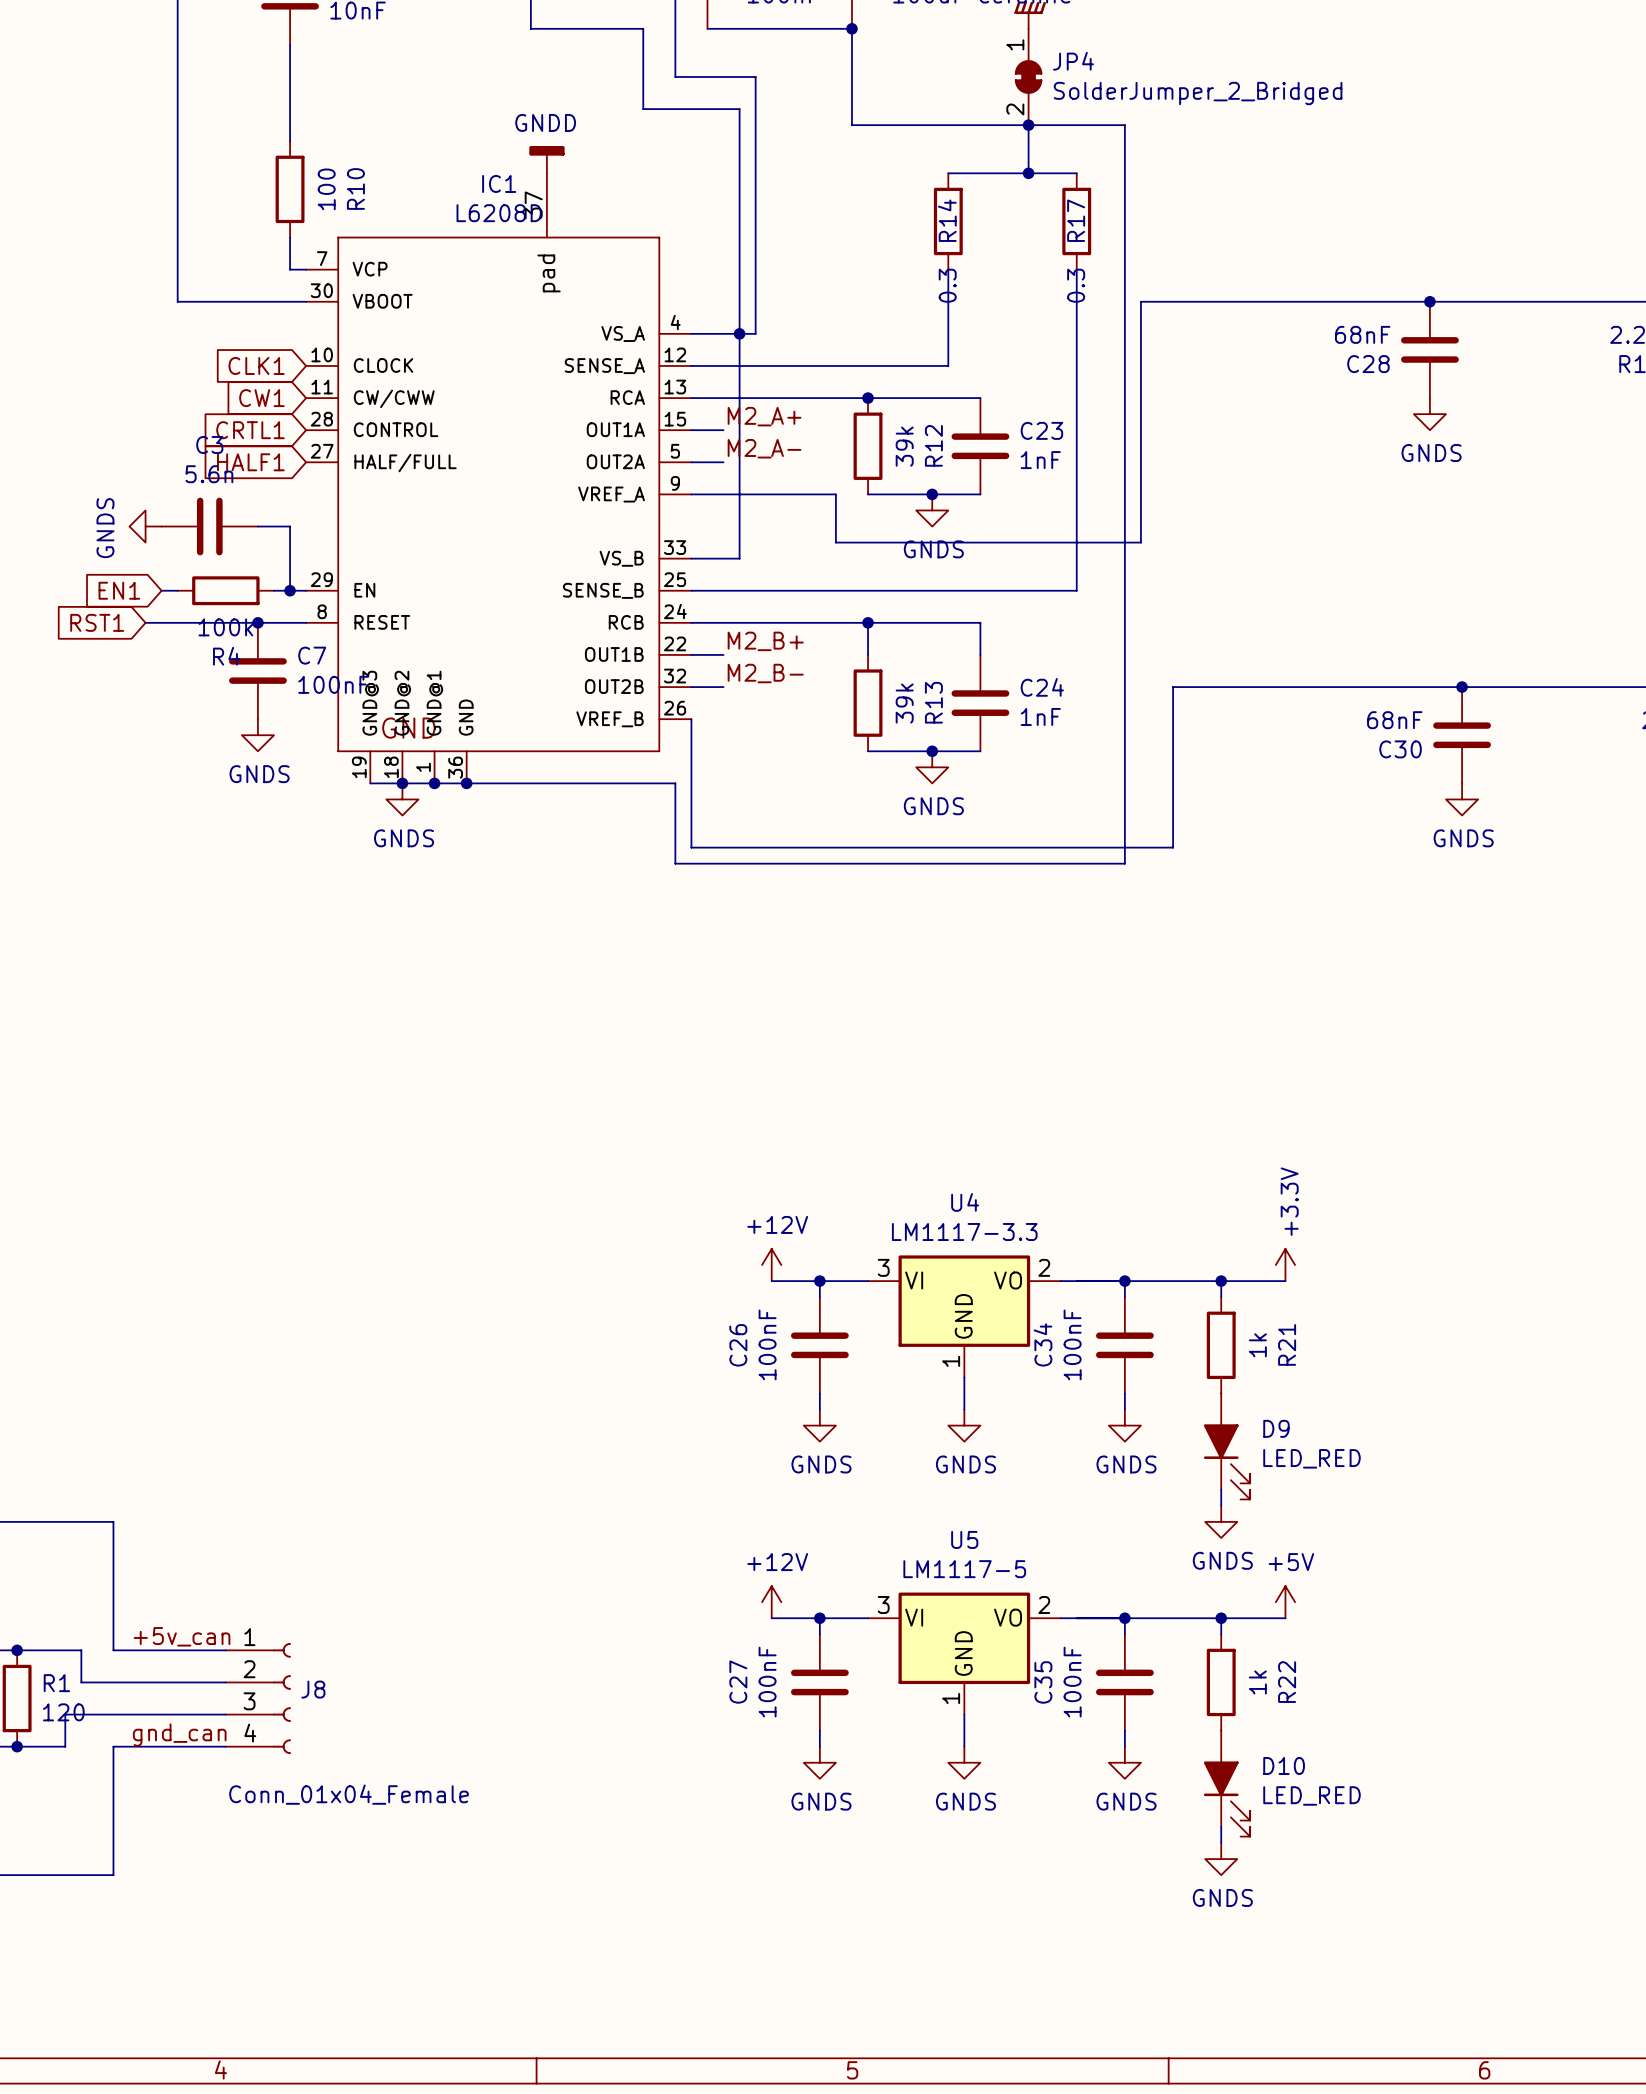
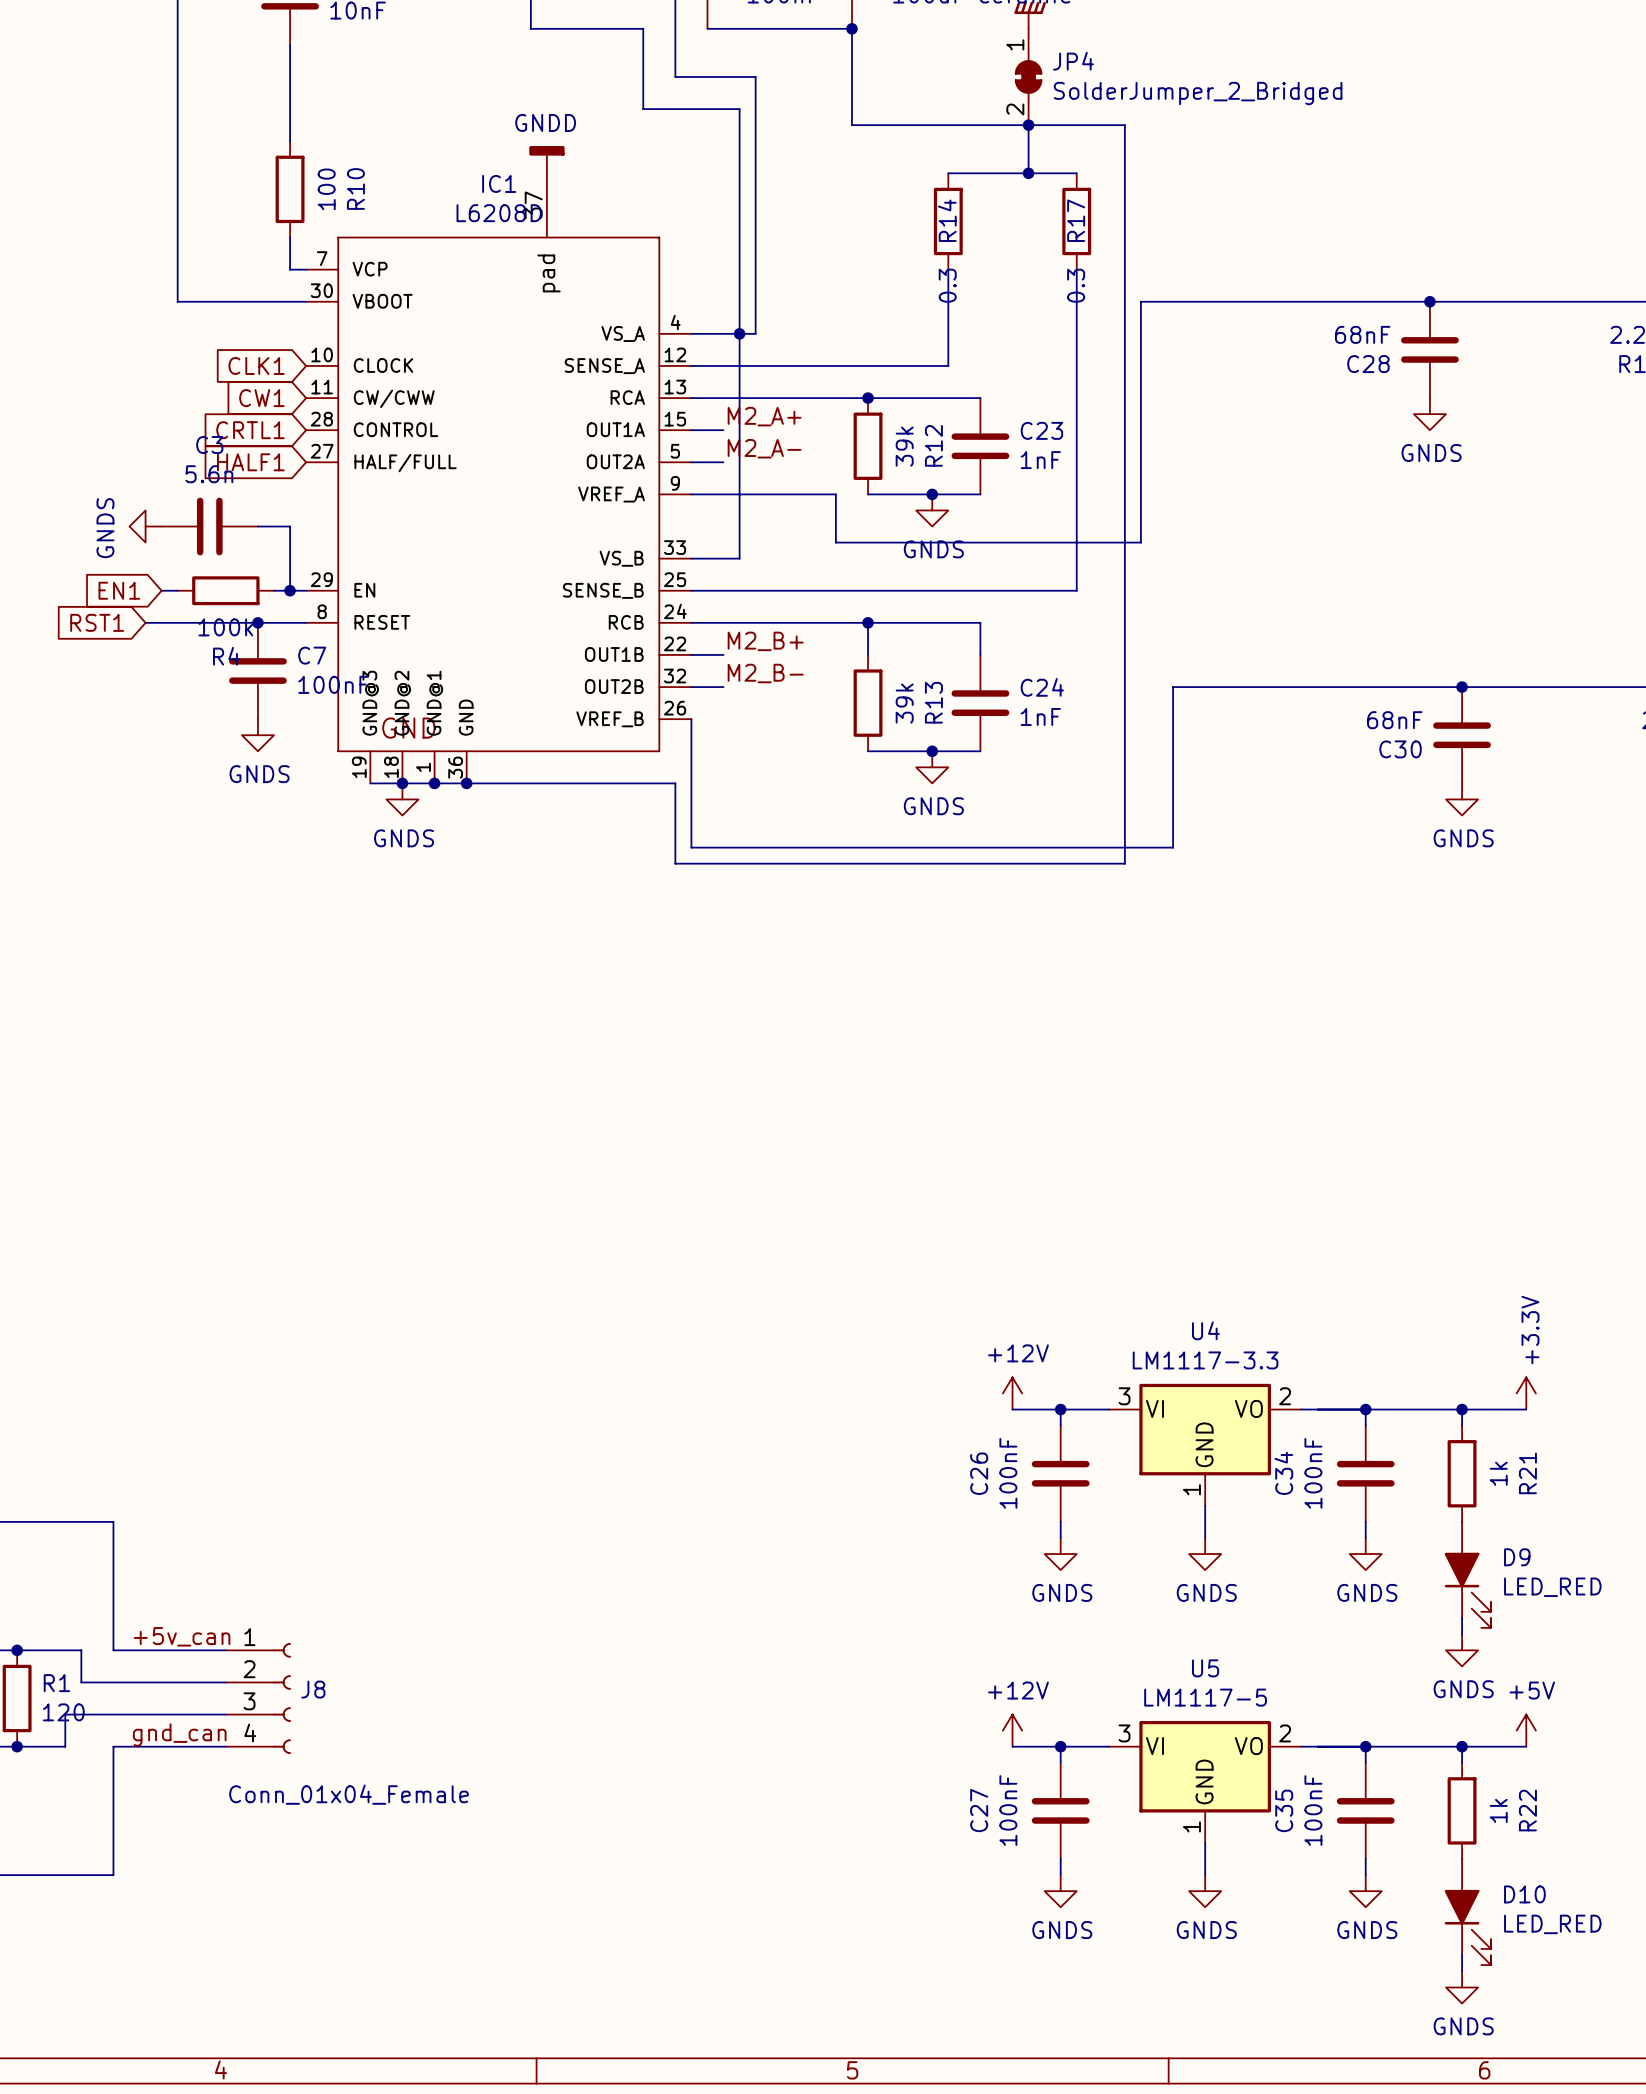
power symbol: +12V (771, 1265) -> none
power symbol position: +3.3V (1285, 1265) -> +3.3V (1526, 1393)
wire: (771, 1281) (868, 1281) -> (1012, 1409) (1108, 1409)
wire: (819, 1281) (819, 1297) -> (1060, 1409) (1060, 1425)
junction: (819, 1281) -> none
wire: (1060, 1281) (1285, 1281) -> (1301, 1409) (1526, 1409)
wire: (1124, 1281) (1124, 1297) -> (1365, 1409) (1365, 1425)
junction: (1124, 1281) -> none
wire: (1221, 1281) (1221, 1297) -> (1462, 1409) (1462, 1425)
junction: (1221, 1281) -> none
U4 position: (964, 1316) -> (1205, 1444)
C26 position: (819, 1345) -> (1060, 1473)
C34 position: (1124, 1345) -> (1365, 1473)
R21 position: (1221, 1345) -> (1462, 1473)
wire: (964, 1377) (964, 1409) -> (1205, 1505) (1205, 1537)
wire: (819, 1393) (819, 1409) -> (1060, 1521) (1060, 1537)
power symbol: none -> +12V (1012, 1393)
wire: (1124, 1393) (1124, 1409) -> (1365, 1521) (1365, 1537)
junction: none -> (1060, 1409)
junction: none -> (1365, 1409)
junction: none -> (1462, 1409)
power symbol: GNDS (819, 1425) -> none
power symbol: GNDS (964, 1425) -> none
power symbol: GNDS (1124, 1425) -> none
D9 position: (1227, 1446) -> (1467, 1574)
wire: (1221, 1489) (1221, 1505) -> (1462, 1618) (1462, 1634)
power symbol position: GNDS (1221, 1521) -> GNDS (1205, 1554)
power symbol: none -> GNDS (1060, 1554)
power symbol: none -> GNDS (1365, 1554)
power symbol: +12V (771, 1602) -> none
power symbol position: +5V (1285, 1602) -> +5V (1526, 1730)
wire: (771, 1618) (868, 1618) -> (1012, 1746) (1108, 1746)
wire: (819, 1618) (819, 1634) -> (1060, 1746) (1060, 1762)
junction: (819, 1618) -> none
wire: (1060, 1618) (1285, 1618) -> (1301, 1746) (1526, 1746)
wire: (1124, 1618) (1124, 1634) -> (1365, 1746) (1365, 1762)
junction: (1124, 1618) -> none
wire: (1221, 1618) (1221, 1634) -> (1462, 1746) (1462, 1762)
junction: (1221, 1618) -> none
power symbol: none -> GNDS (1462, 1650)
U5 position: (964, 1653) -> (1205, 1782)
C27 position: (819, 1682) -> (1060, 1810)
C35 position: (1124, 1682) -> (1365, 1810)
R22 position: (1221, 1682) -> (1462, 1810)
wire: (964, 1714) (964, 1746) -> (1205, 1843) (1205, 1875)
wire: (819, 1730) (819, 1746) -> (1060, 1859) (1060, 1875)
power symbol: none -> +12V (1012, 1730)
wire: (1124, 1730) (1124, 1746) -> (1365, 1859) (1365, 1875)
junction: none -> (1060, 1746)
junction: none -> (1365, 1746)
junction: none -> (1462, 1746)
power symbol: GNDS (819, 1762) -> none
power symbol: GNDS (964, 1762) -> none
power symbol: GNDS (1124, 1762) -> none
D10 position: (1227, 1783) -> (1467, 1912)
wire: (1221, 1826) (1221, 1843) -> (1462, 1955) (1462, 1971)
power symbol position: GNDS (1221, 1859) -> GNDS (1205, 1891)
power symbol: none -> GNDS (1060, 1891)
power symbol: none -> GNDS (1365, 1891)
power symbol: none -> GNDS (1462, 1987)

